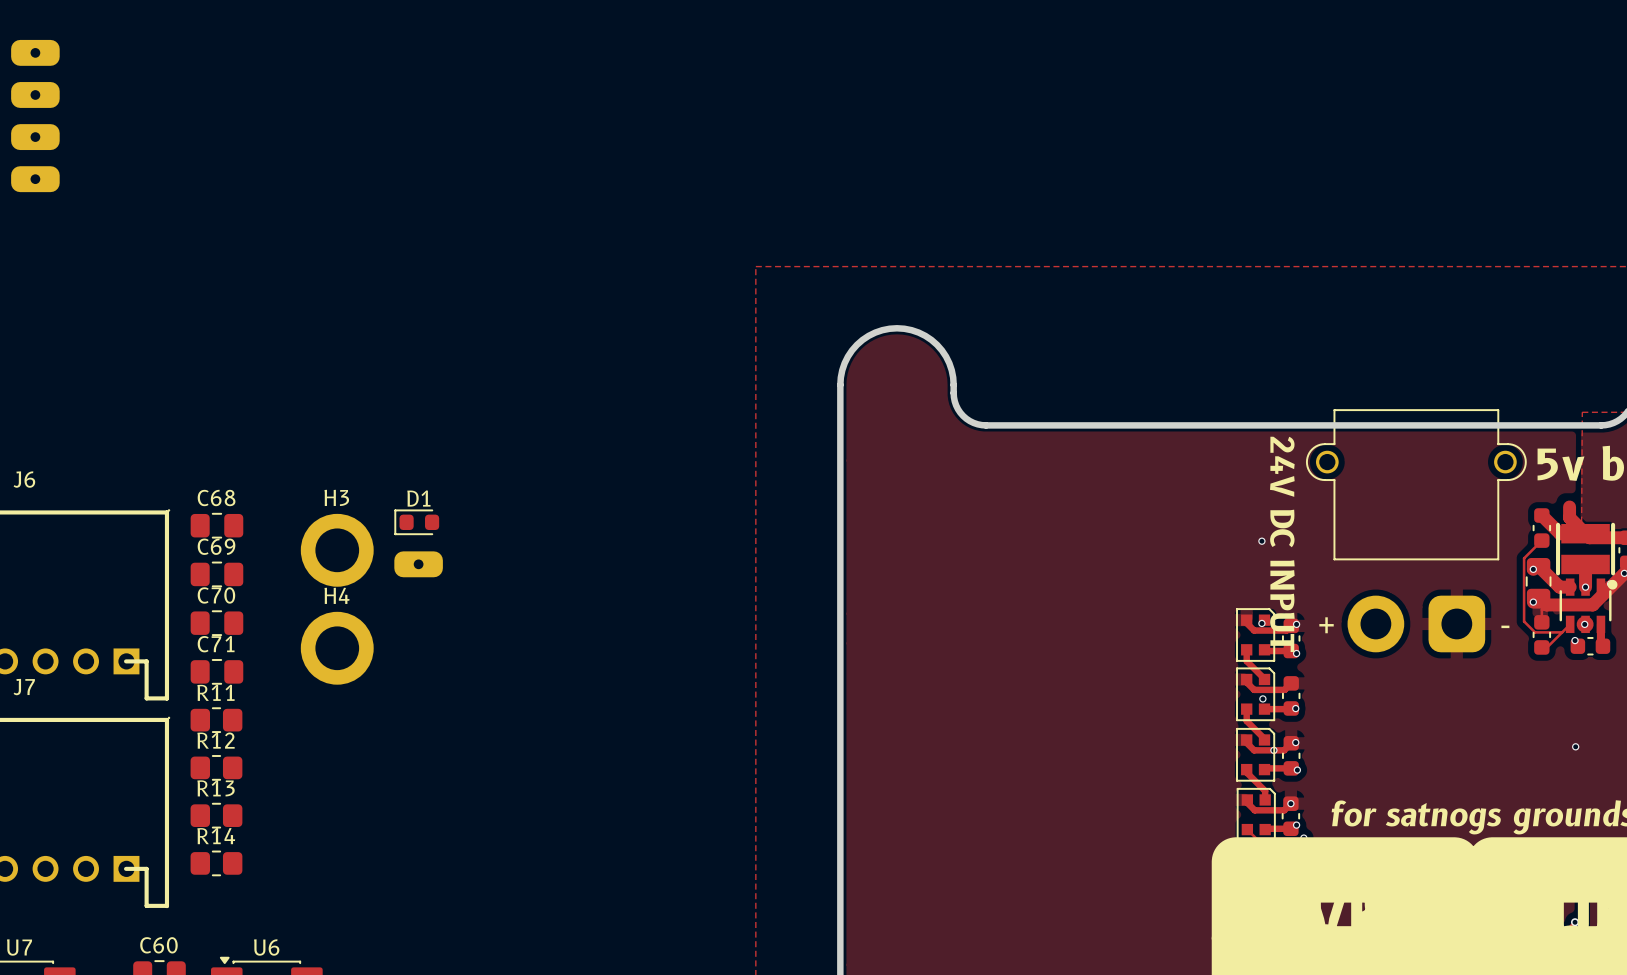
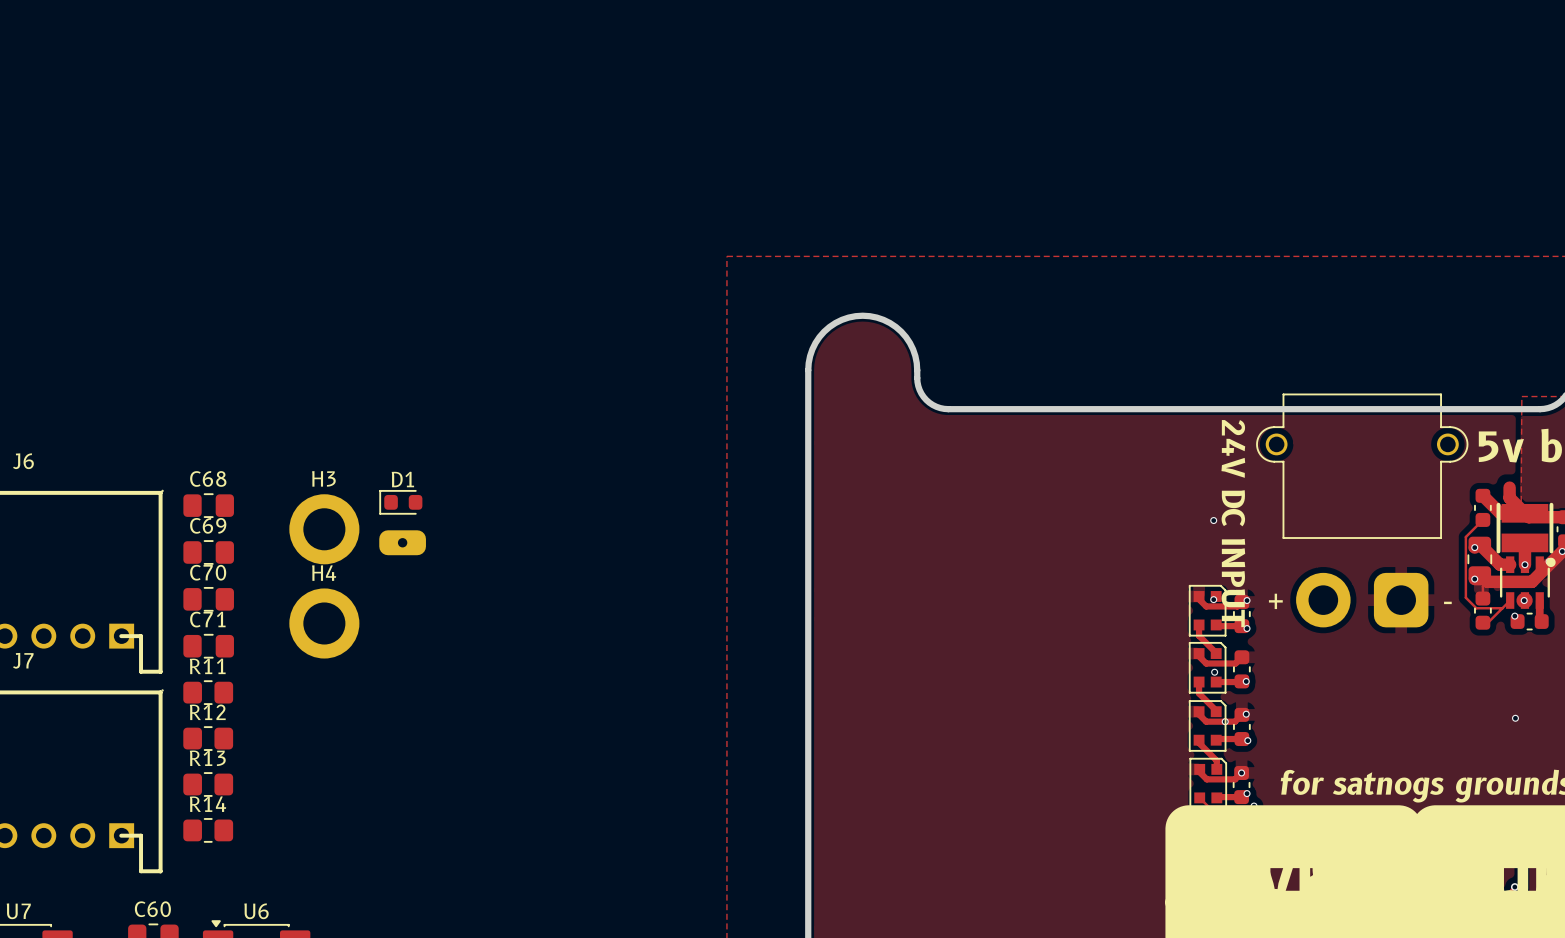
part: (35, 52) -> none
part: (35, 94) -> none
part: (35, 137) -> none
part: (35, 179) -> none

